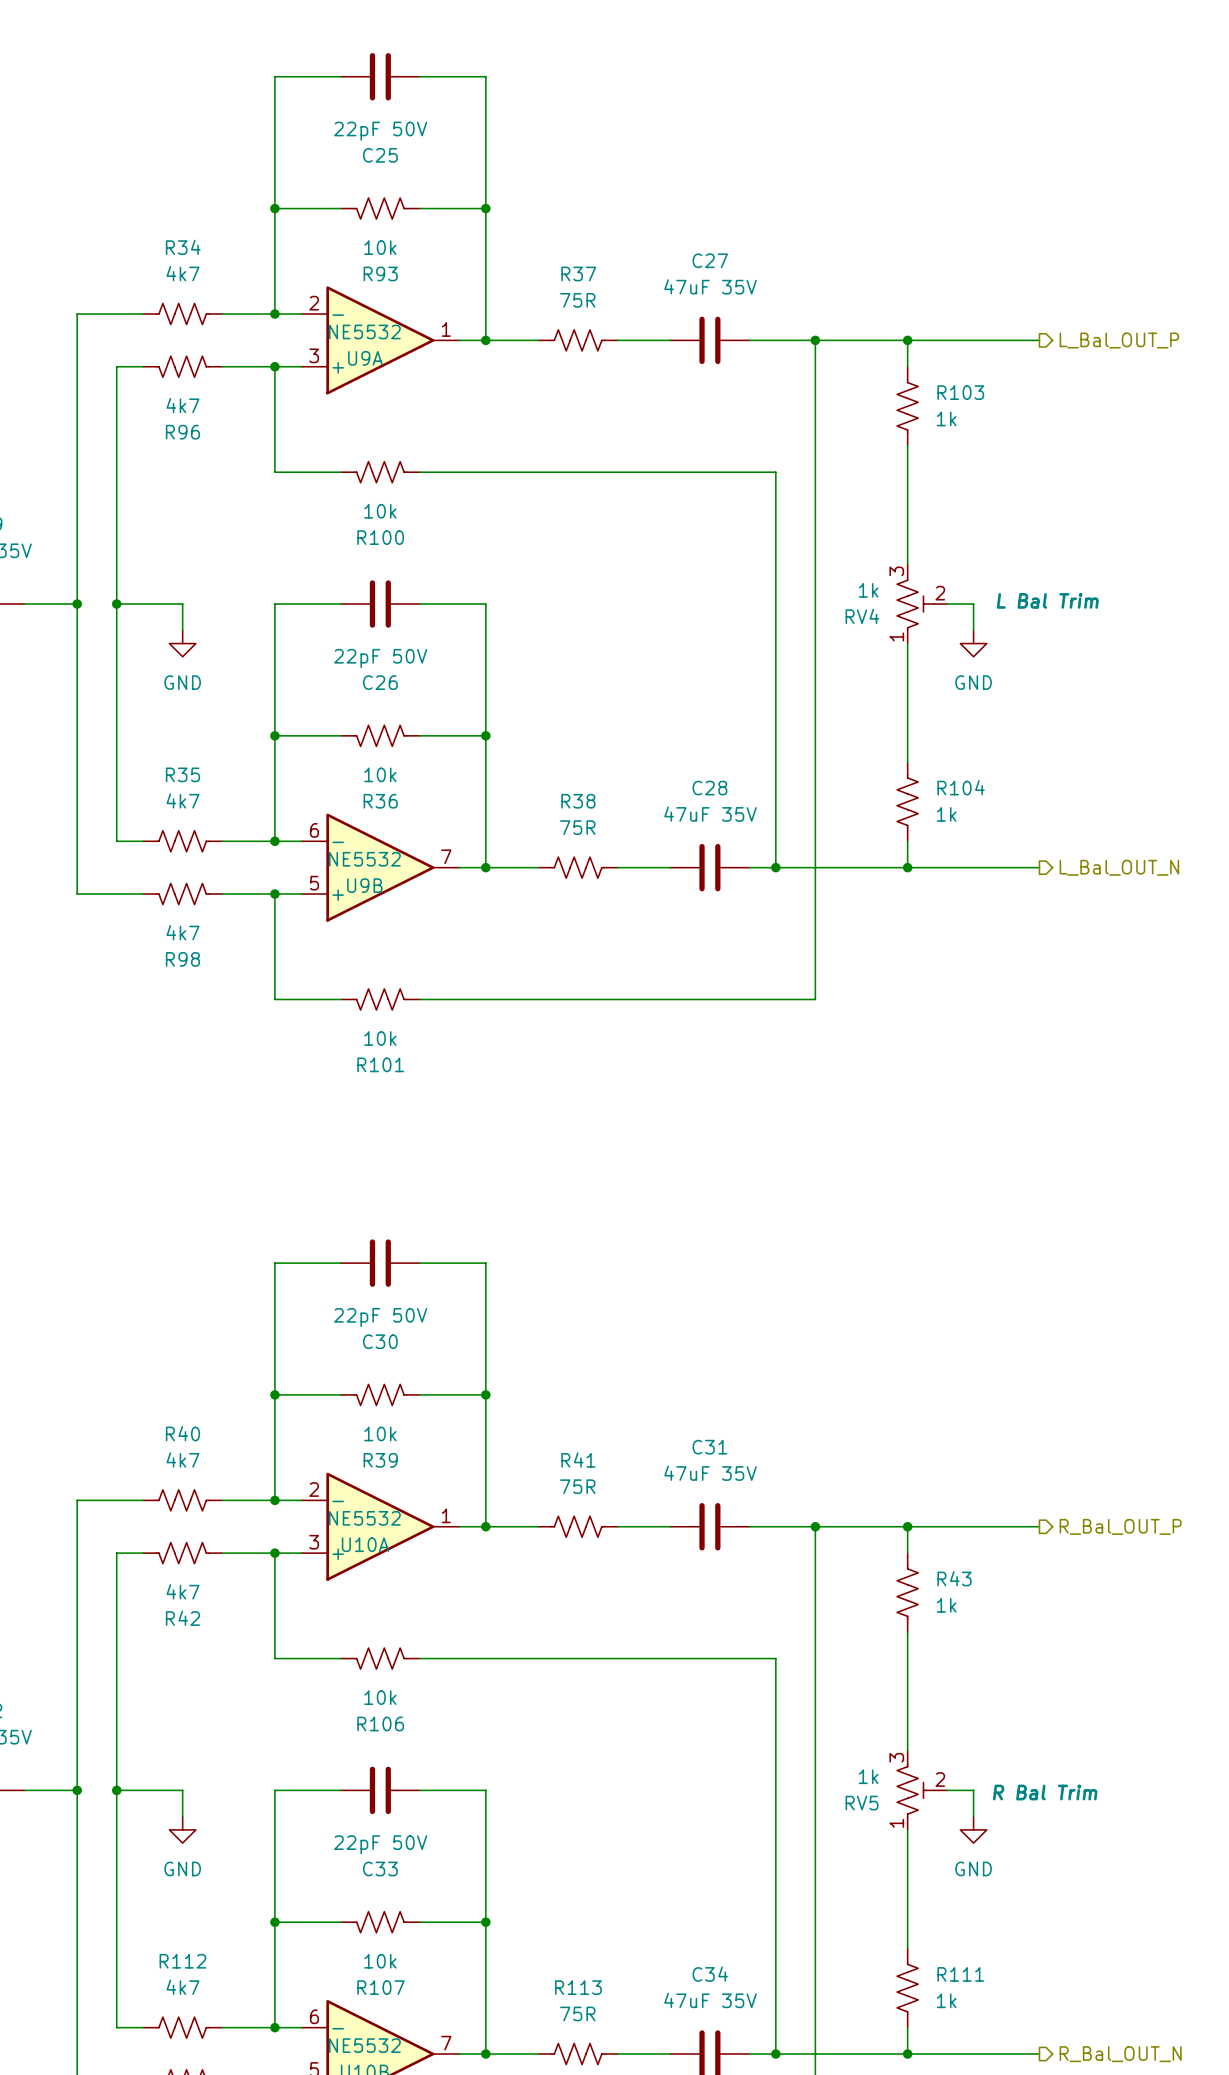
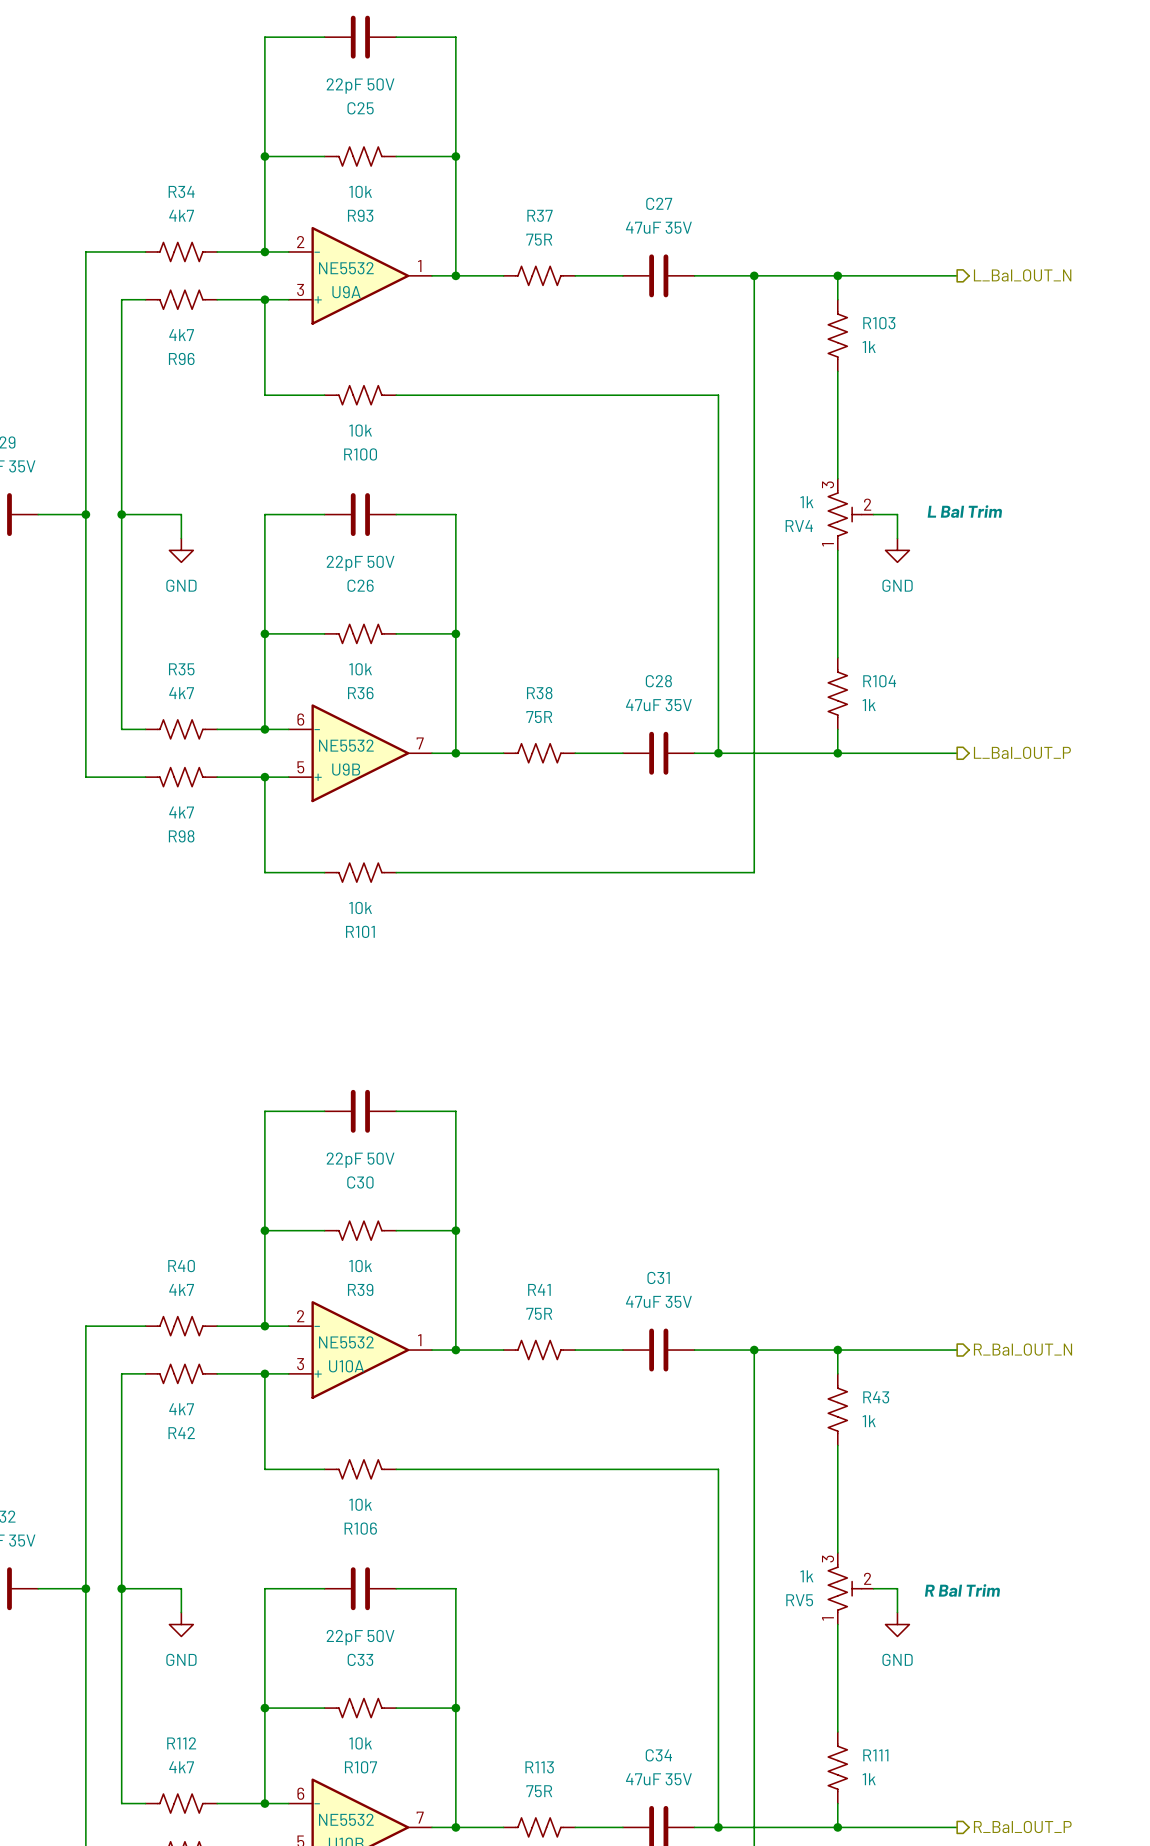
hierarchical label: L_Bal_OUT_P (1119, 340) -> L_Bal_OUT_N (1022, 275)
hierarchical label: L_Bal_OUT_N (1119, 867) -> L_Bal_OUT_P (1022, 752)
hierarchical label: R_Bal_OUT_P (1120, 1526) -> R_Bal_OUT_N (1023, 1349)
hierarchical label: R_Bal_OUT_N (1120, 2054) -> R_Bal_OUT_P (1022, 1826)

